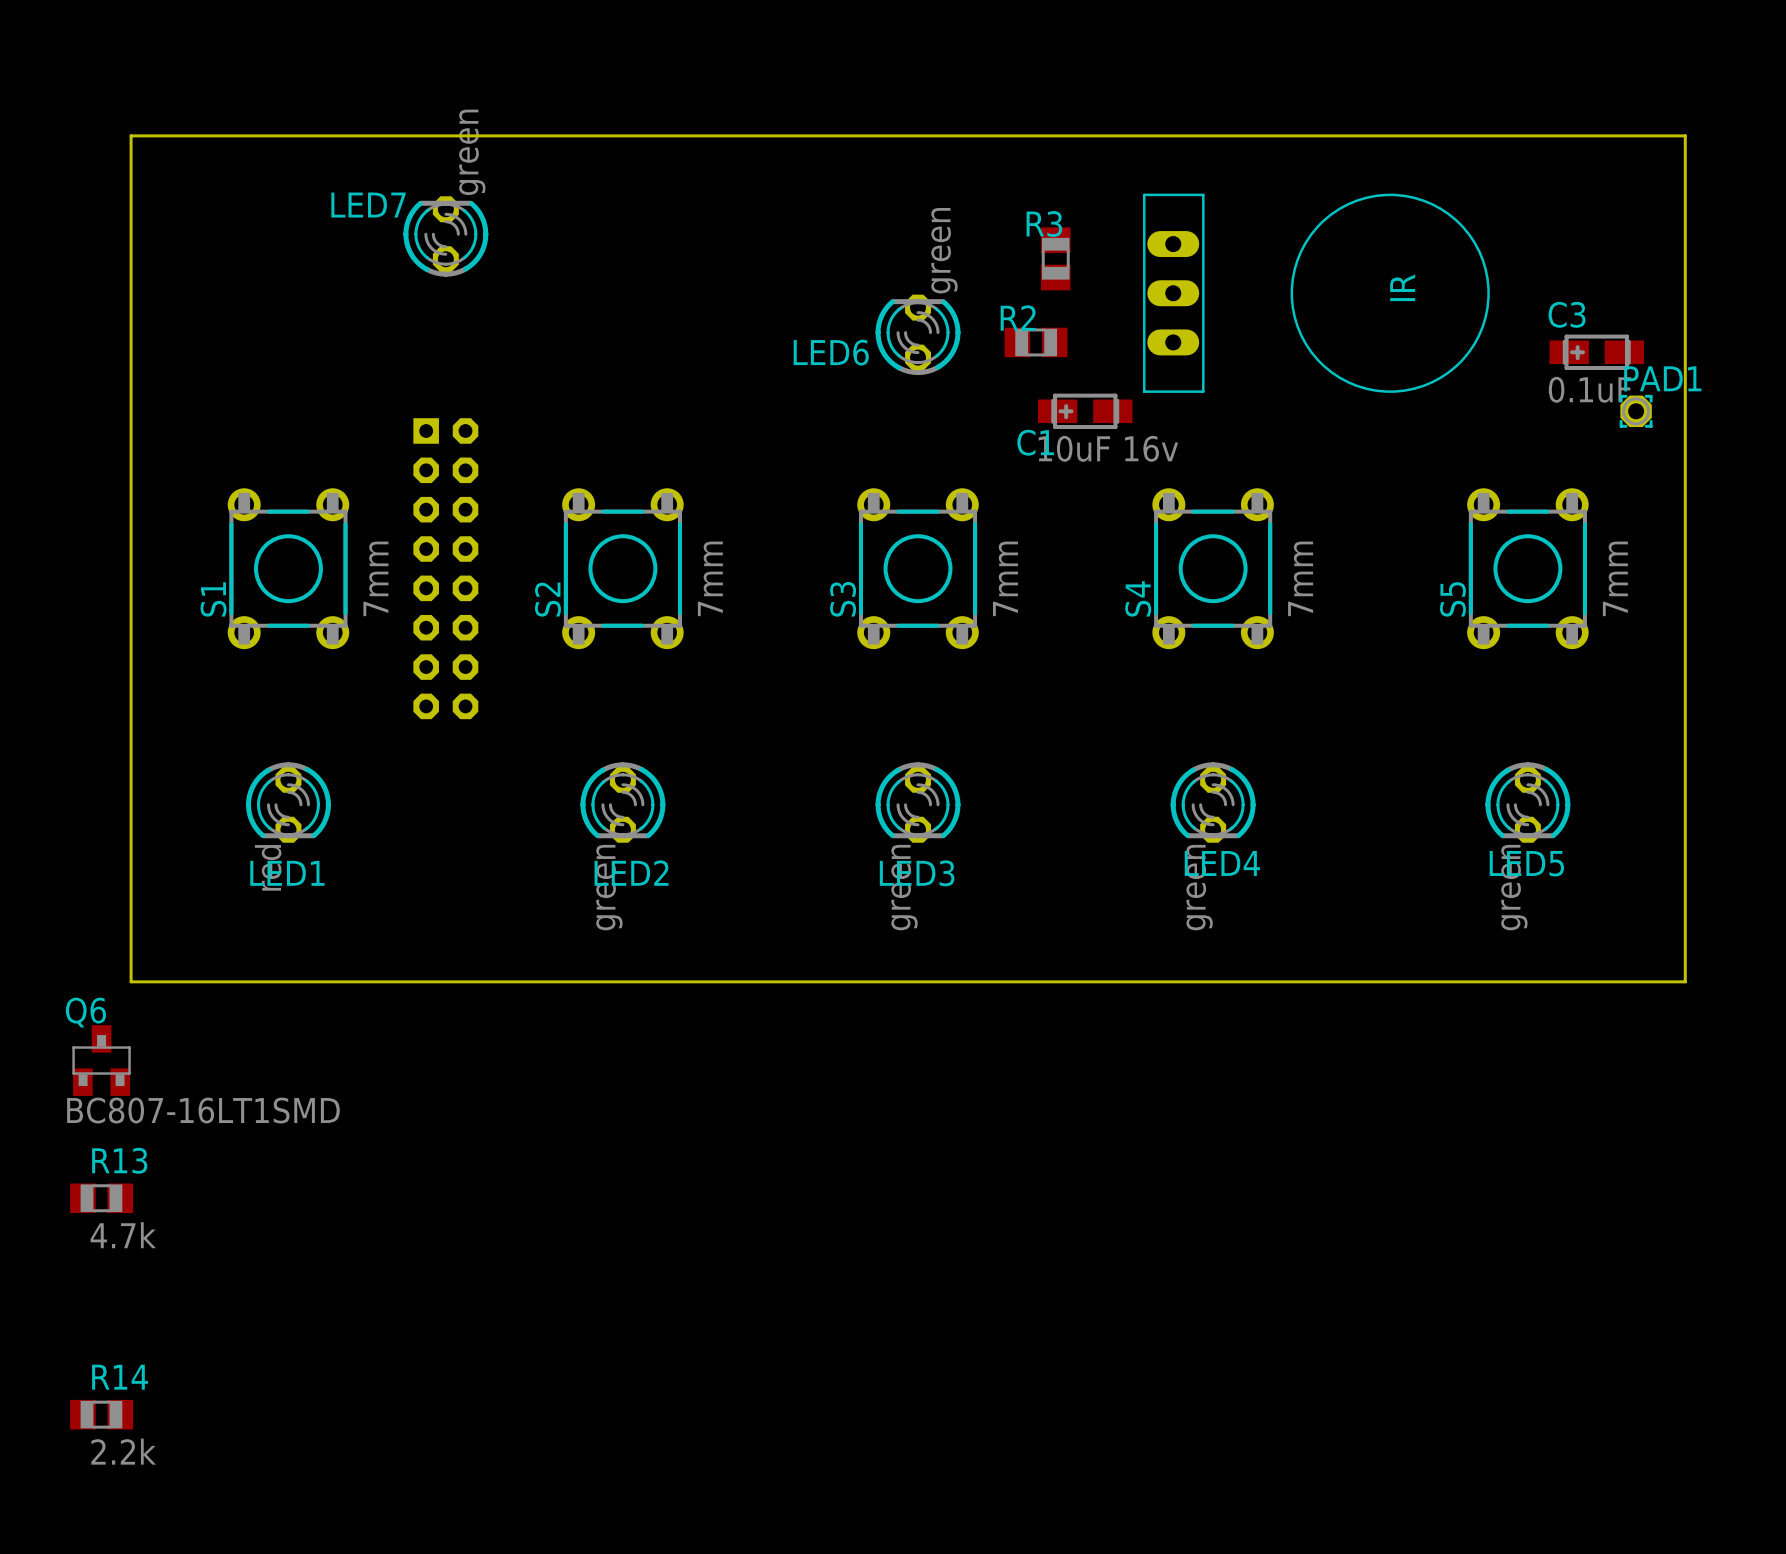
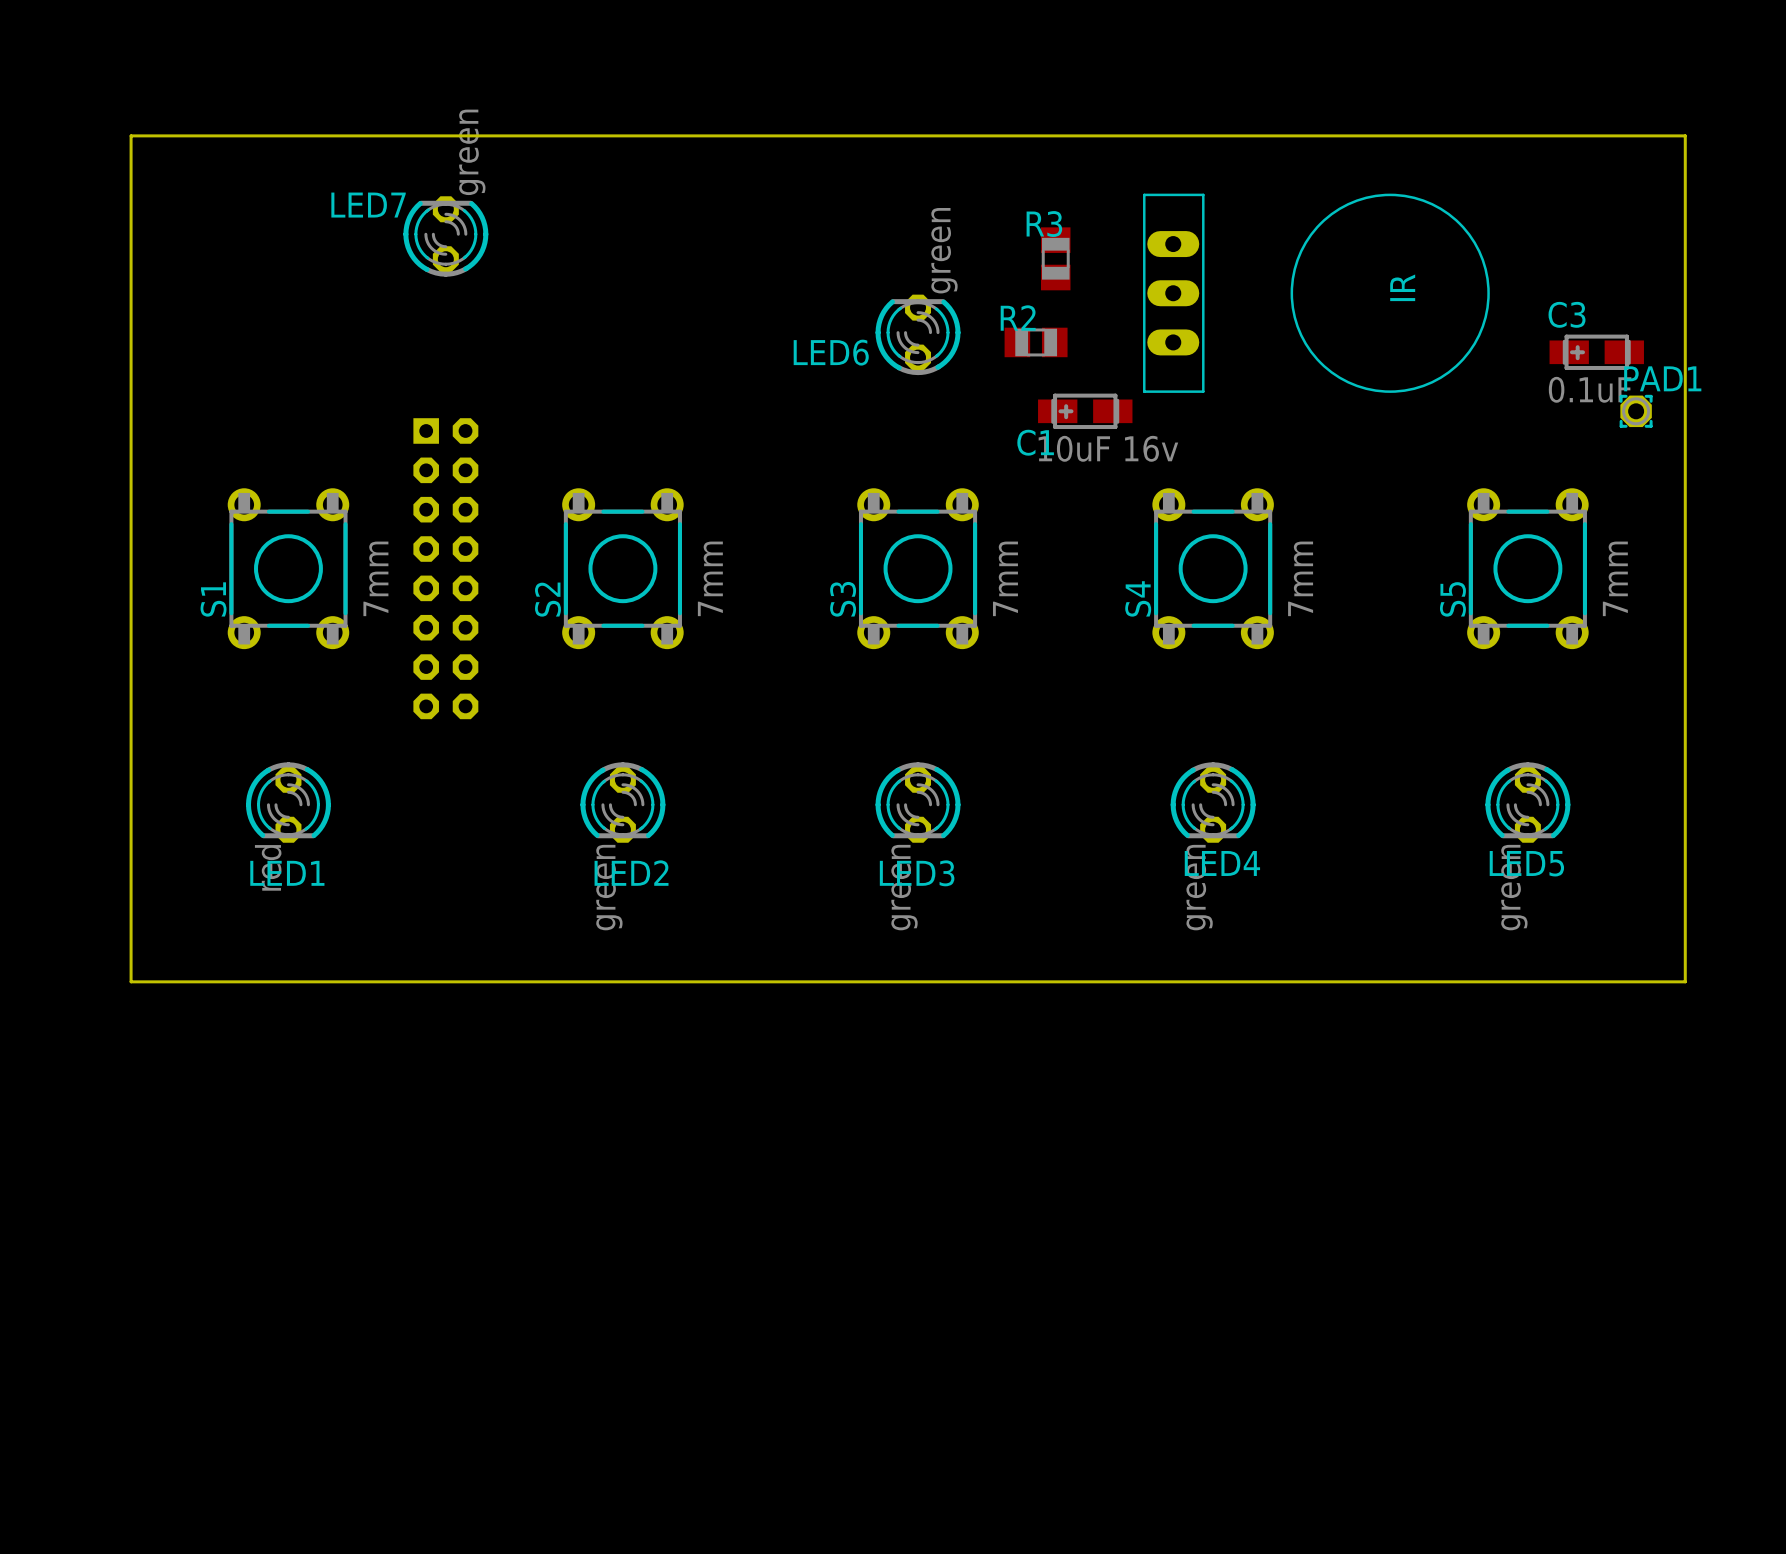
Q6: BC807-16LT1SMD (101, 1060) -> none
R13: 4.7k (101, 1198) -> none
R14: 2.2k (101, 1414) -> none

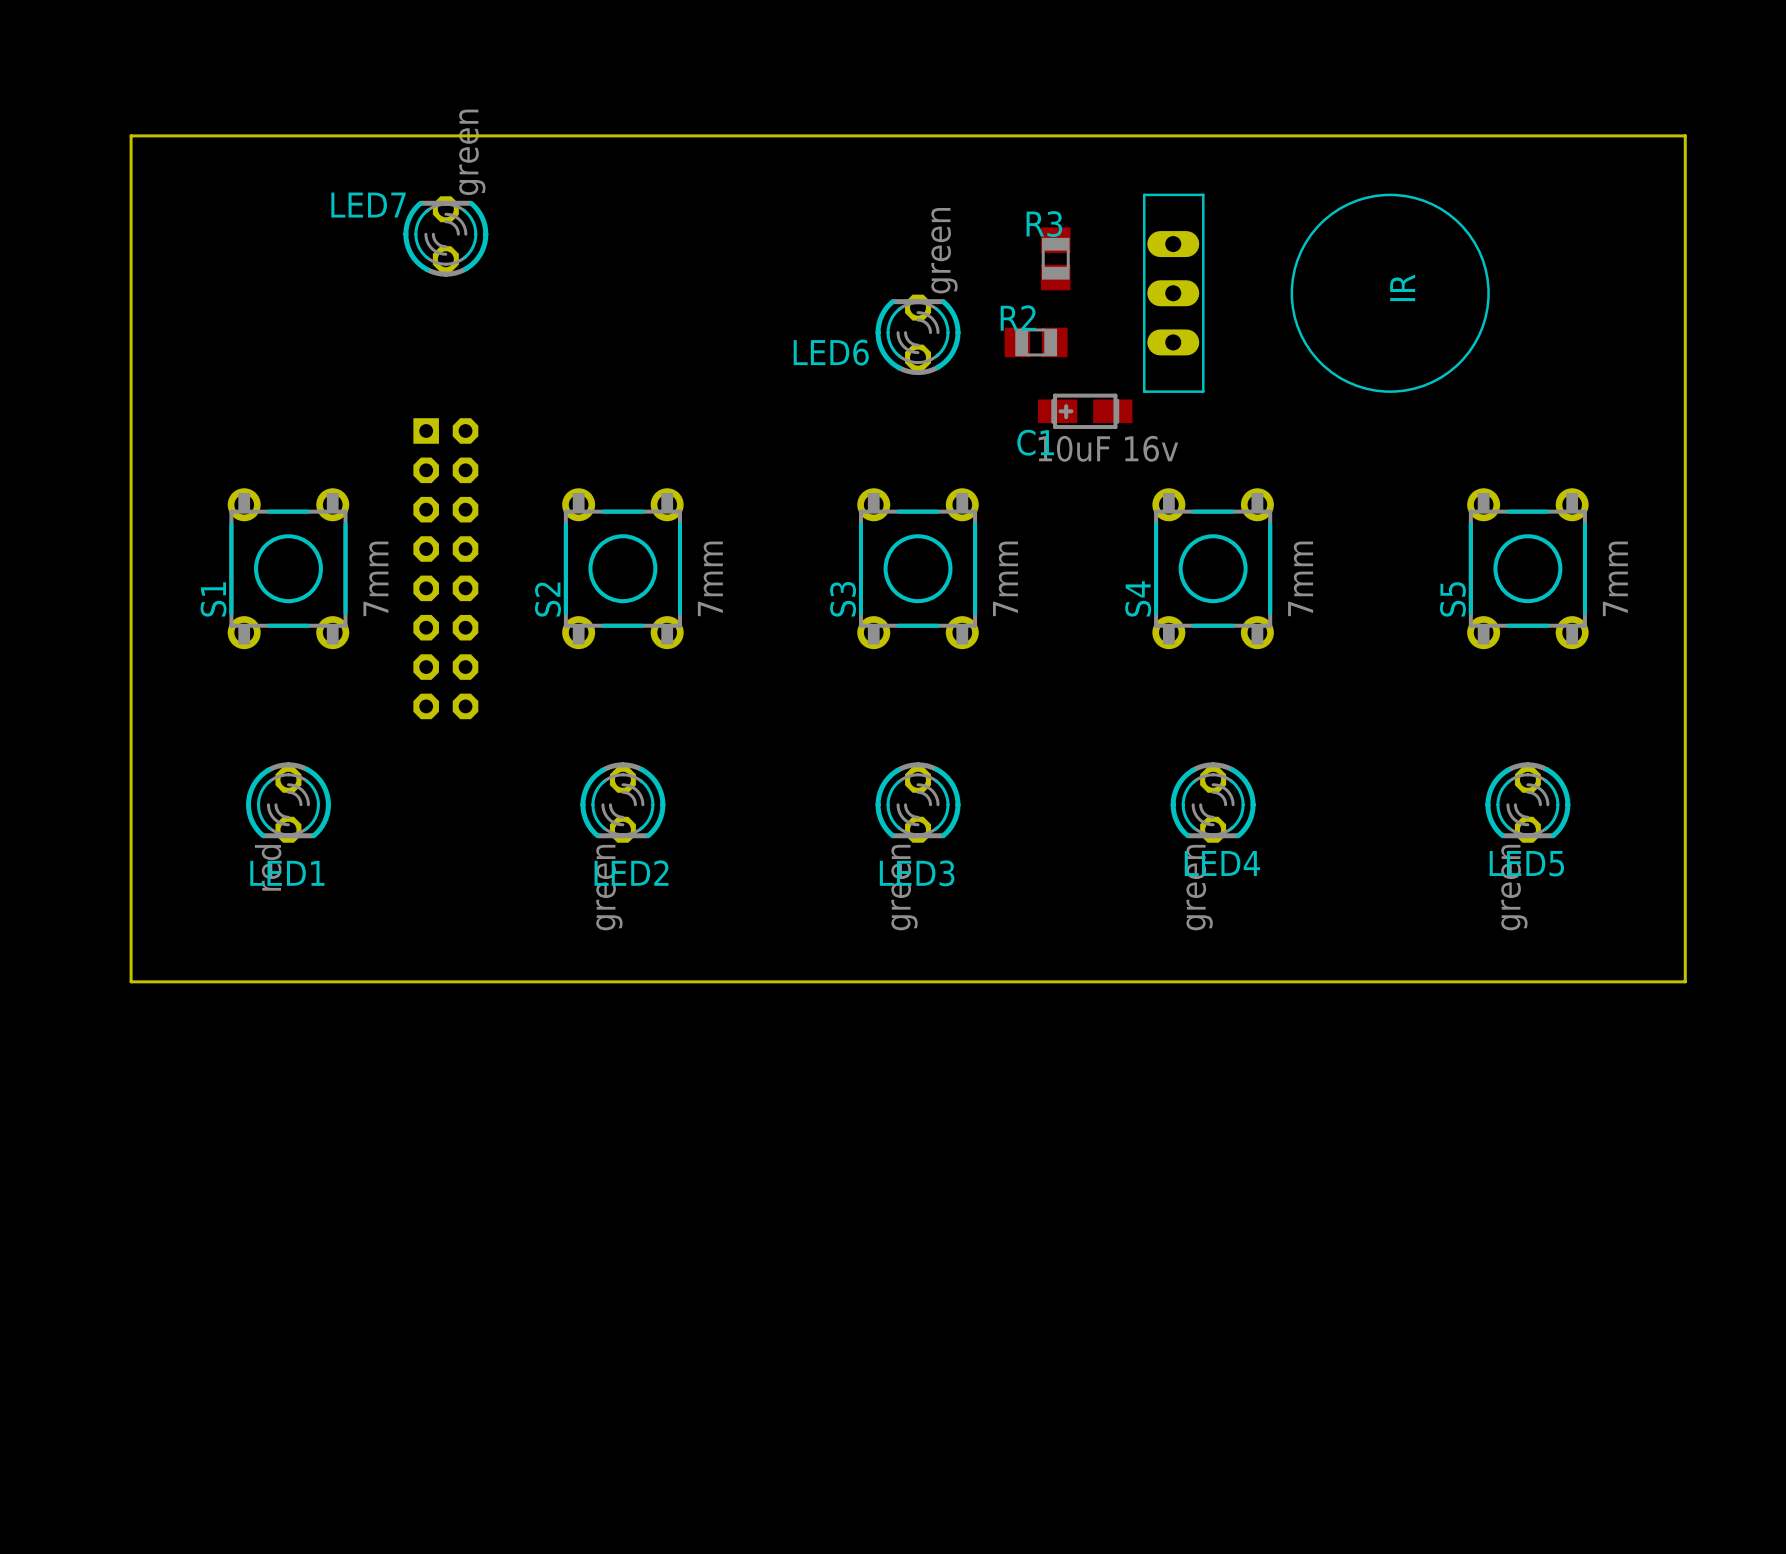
C3: 0.1uF (1596, 352) -> none
PAD1: (1636, 411) -> none

